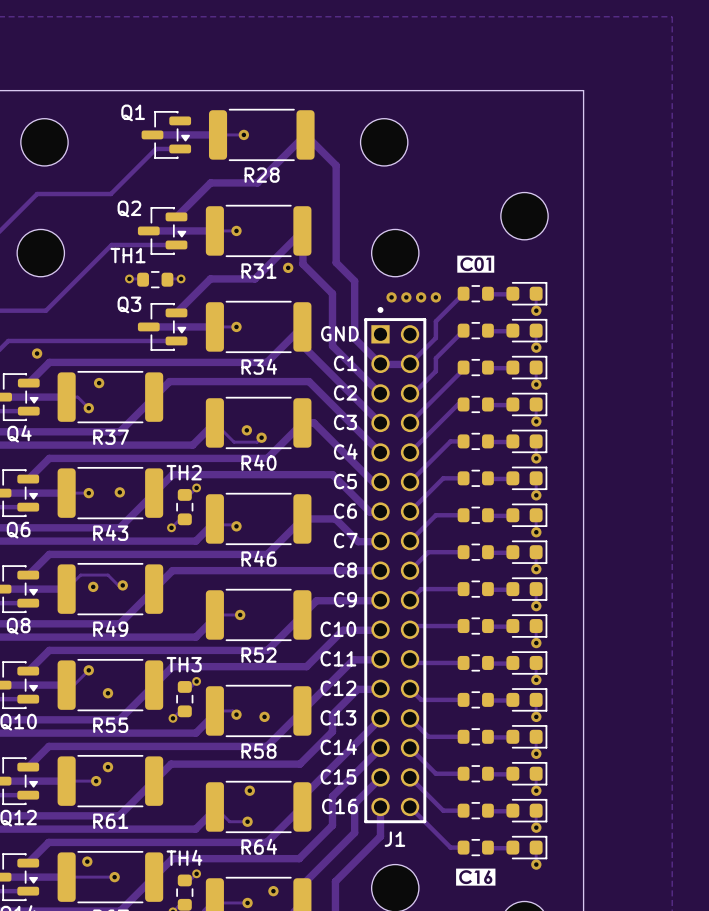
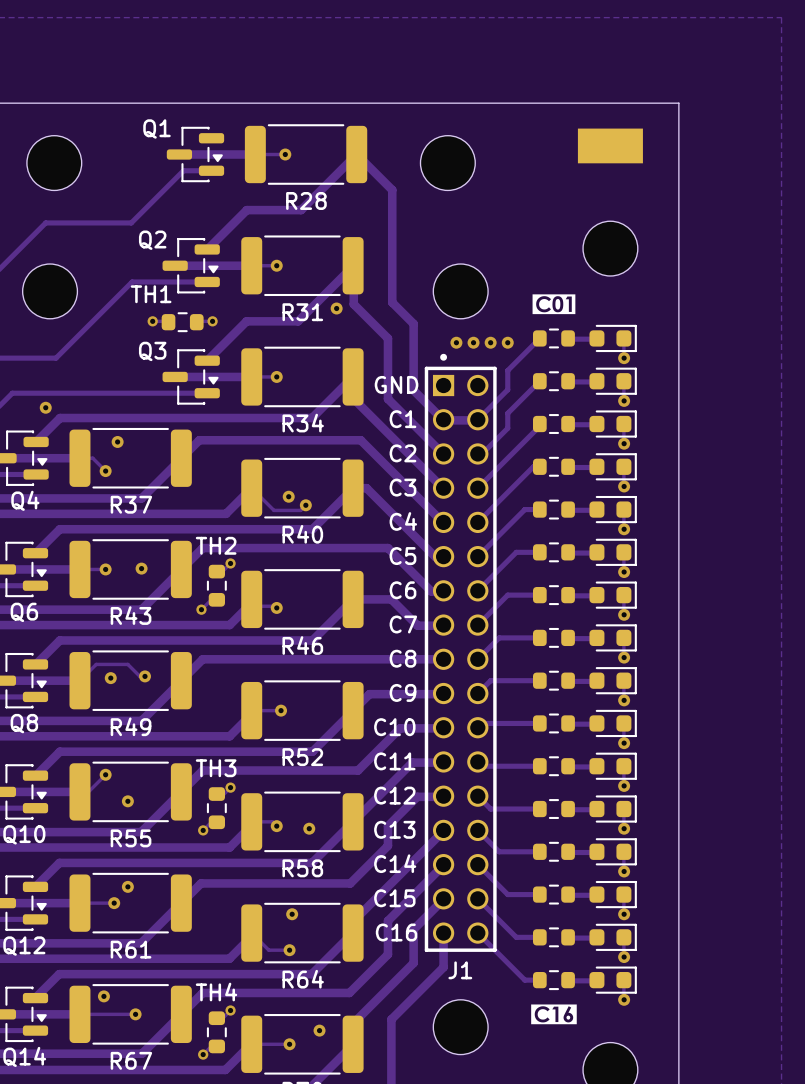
part: none -> (610, 145)

